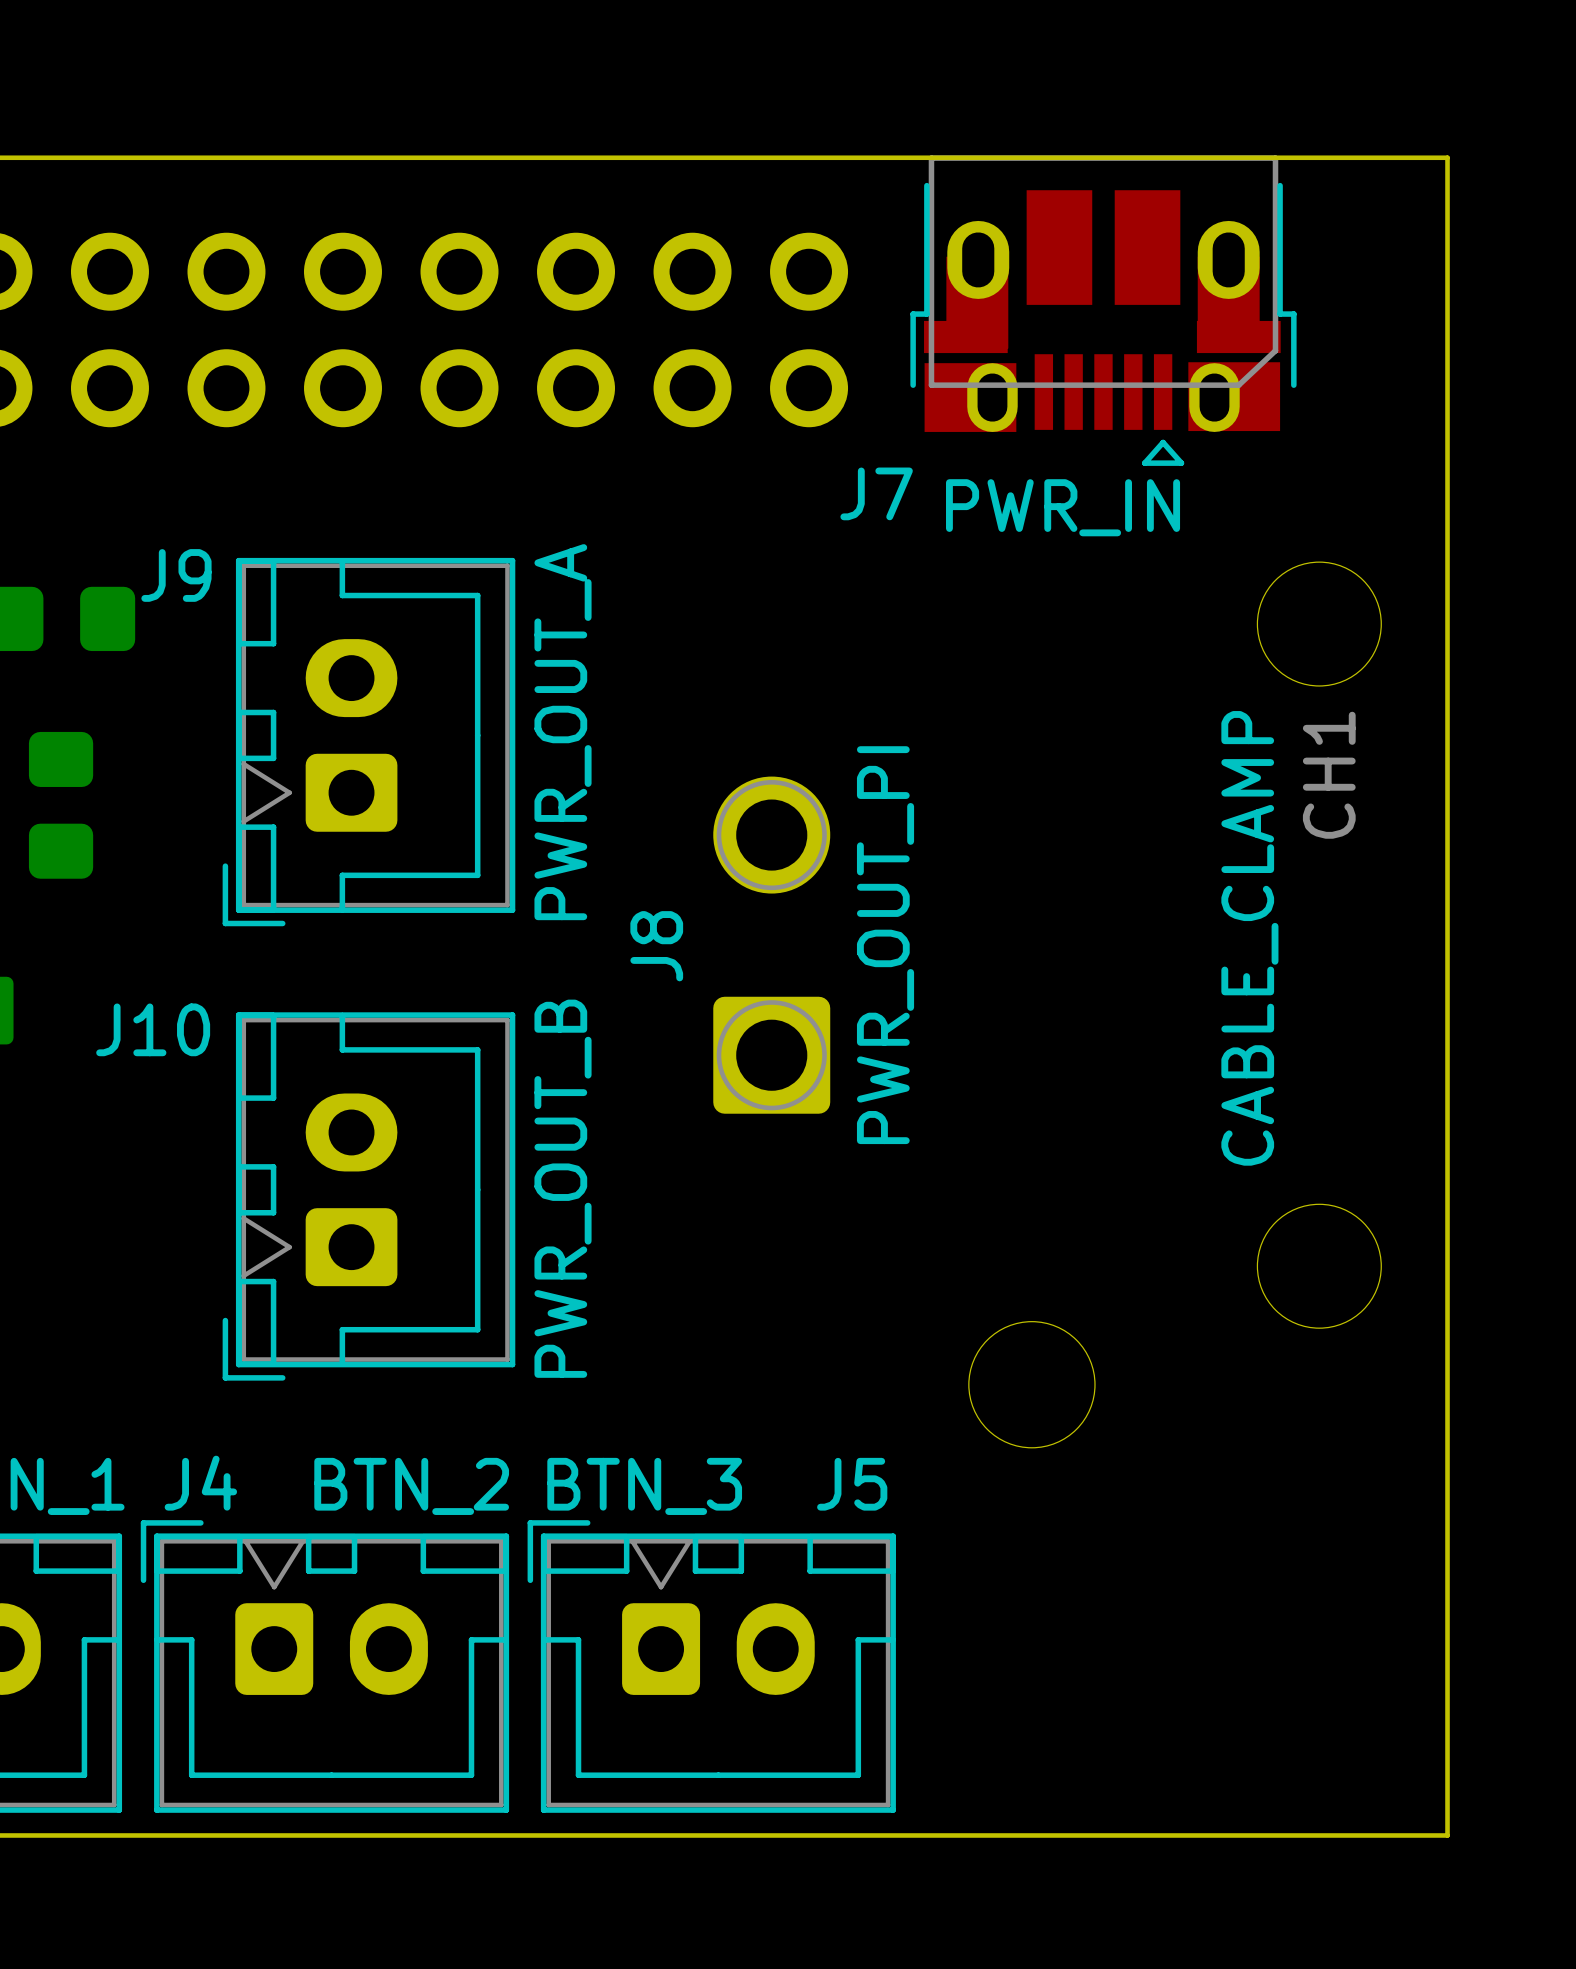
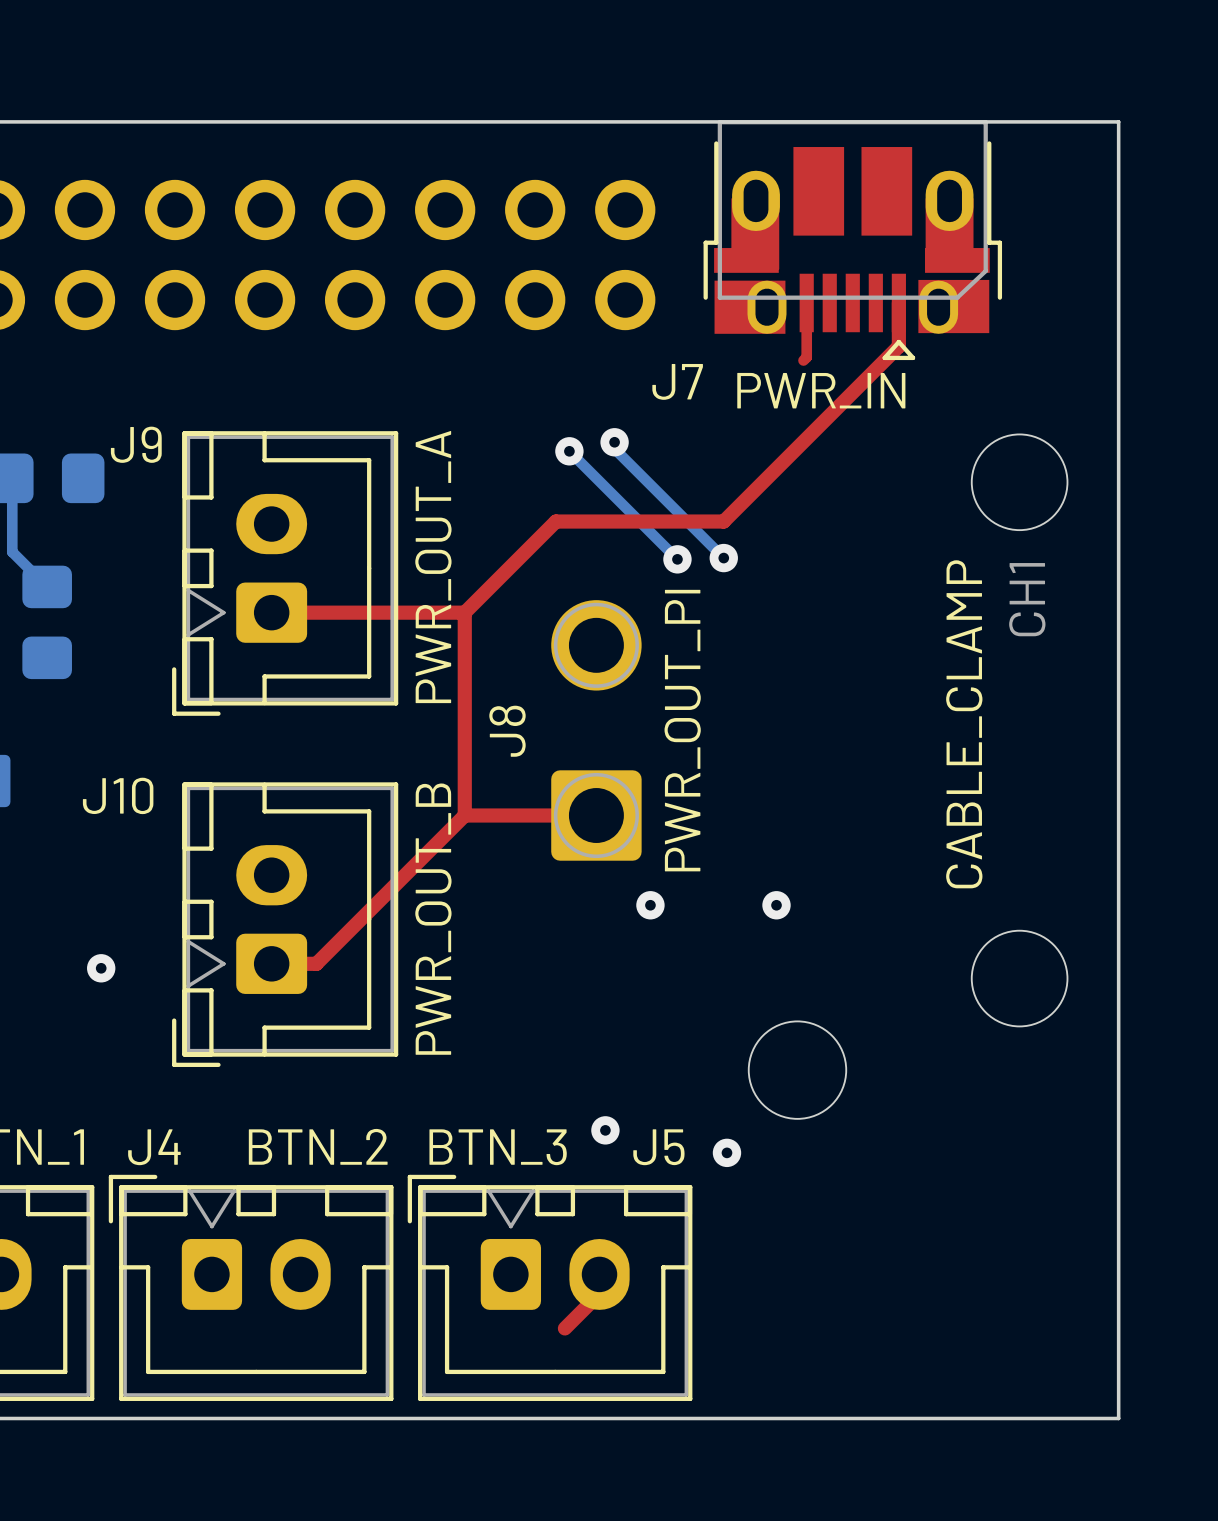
top track: none -> (806, 302) (806, 357) (803, 360)
top track: none -> (898, 302) (898, 346) (723, 521) (555, 521) (464, 612)
bottom track: none -> (614, 442) (614, 448) (723, 558)
via: none -> (614, 442)
bottom track: none -> (569, 451) (677, 559)
via: none -> (569, 451)
bottom track: none -> (12, 478) (12, 552) (47, 586)
via: none -> (723, 558)
via: none -> (677, 559)
top track: none -> (271, 612) (464, 612)
top track: none -> (464, 612) (464, 815)
top track: none -> (464, 815) (316, 963) (271, 963)
top track: none -> (464, 815) (596, 815)
via: none -> (650, 905)
via: none -> (776, 905)
via: none -> (101, 968)
via: none -> (605, 1130)
via: none -> (726, 1152)
top track: none -> (599, 1274) (599, 1293) (564, 1328)

